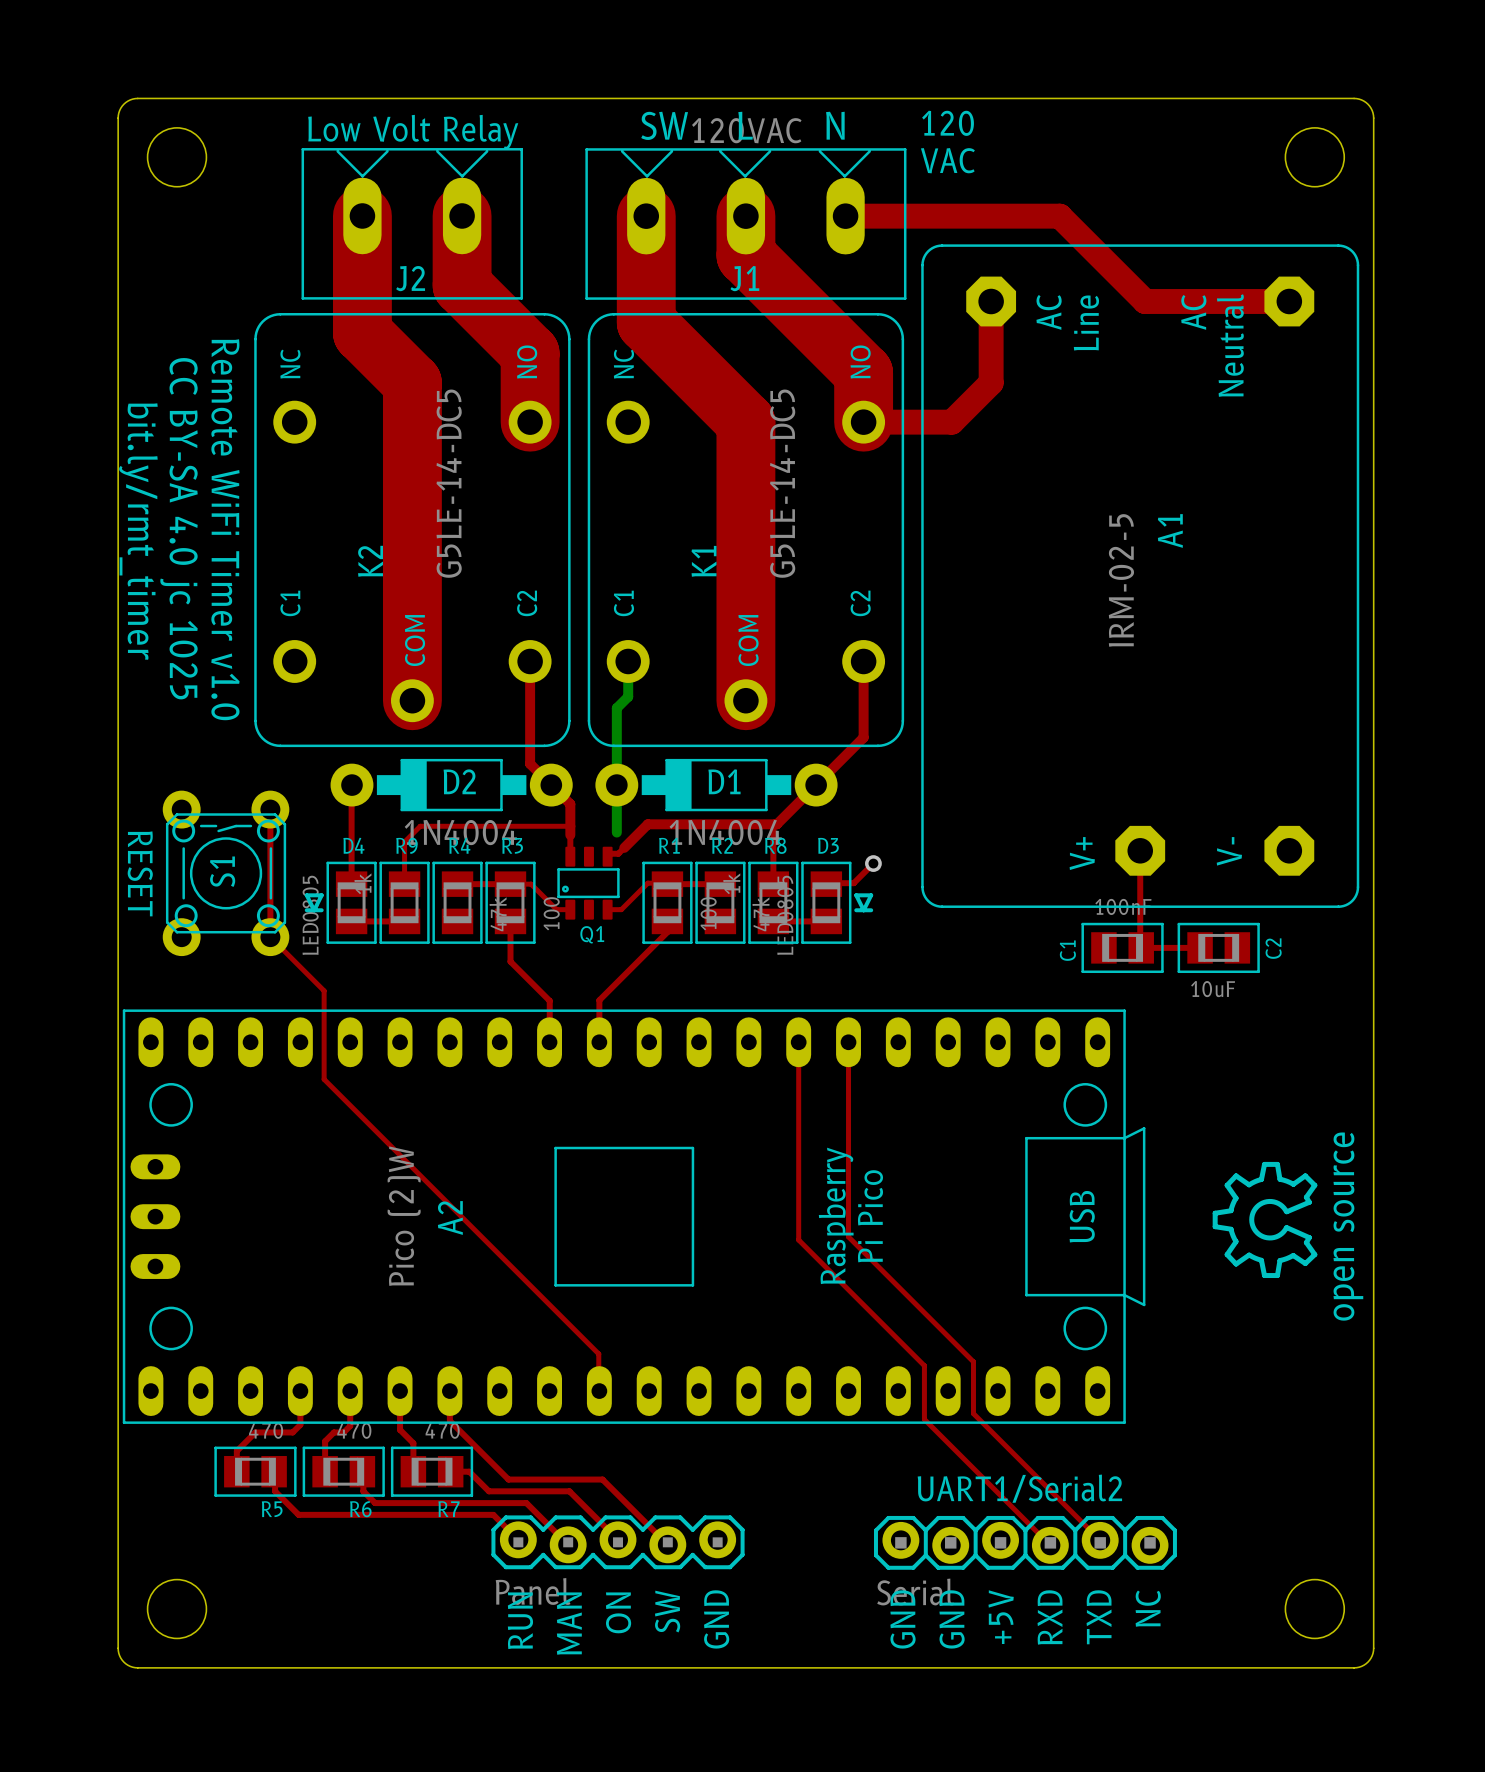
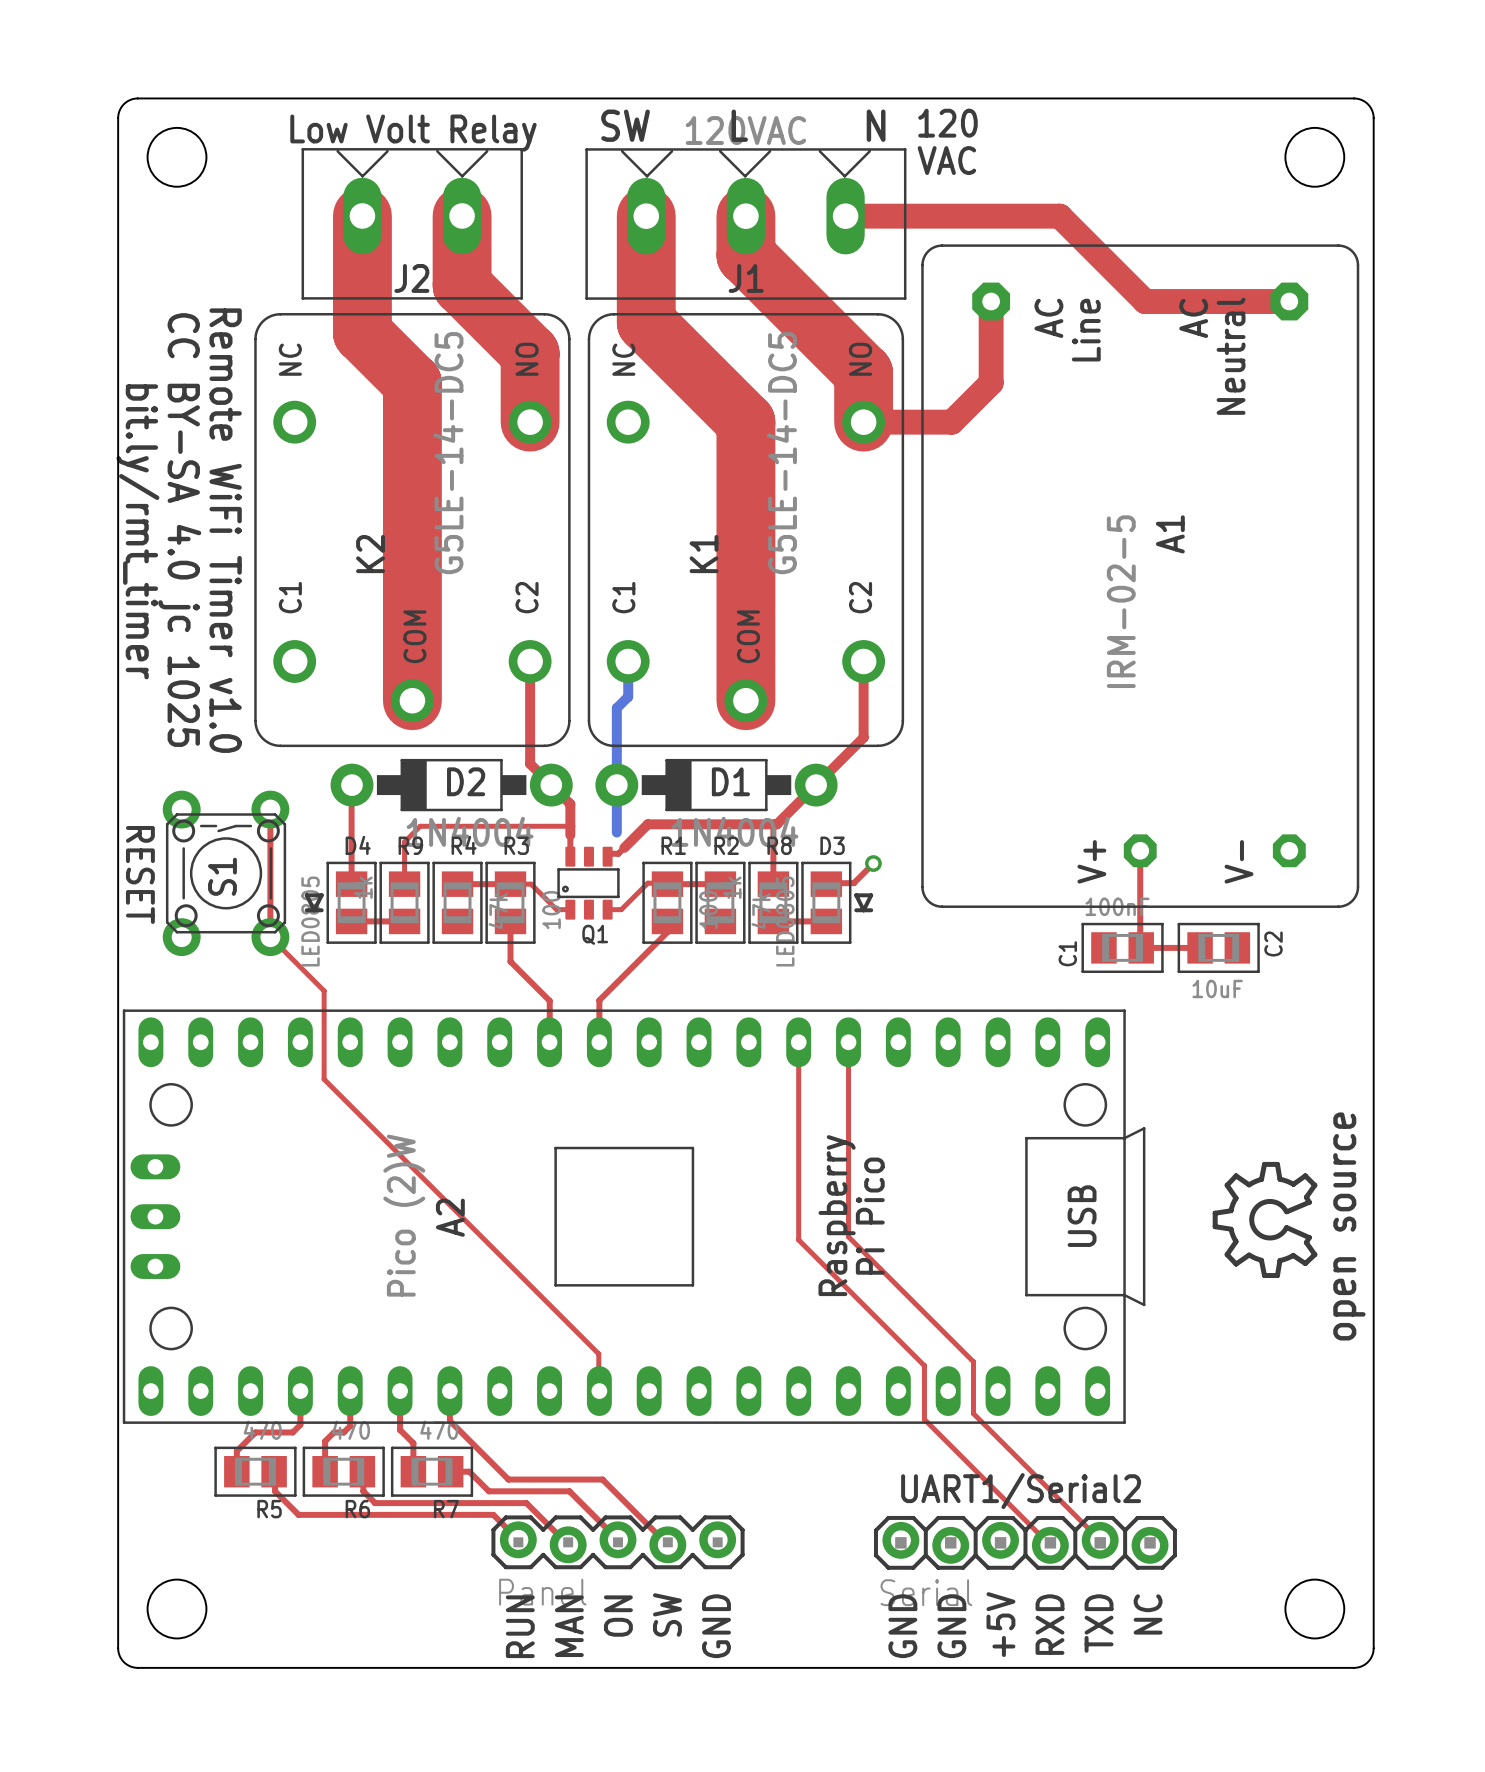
A1 footprint: [921, 244, 1360, 908] -> [921, 244, 1360, 908]

